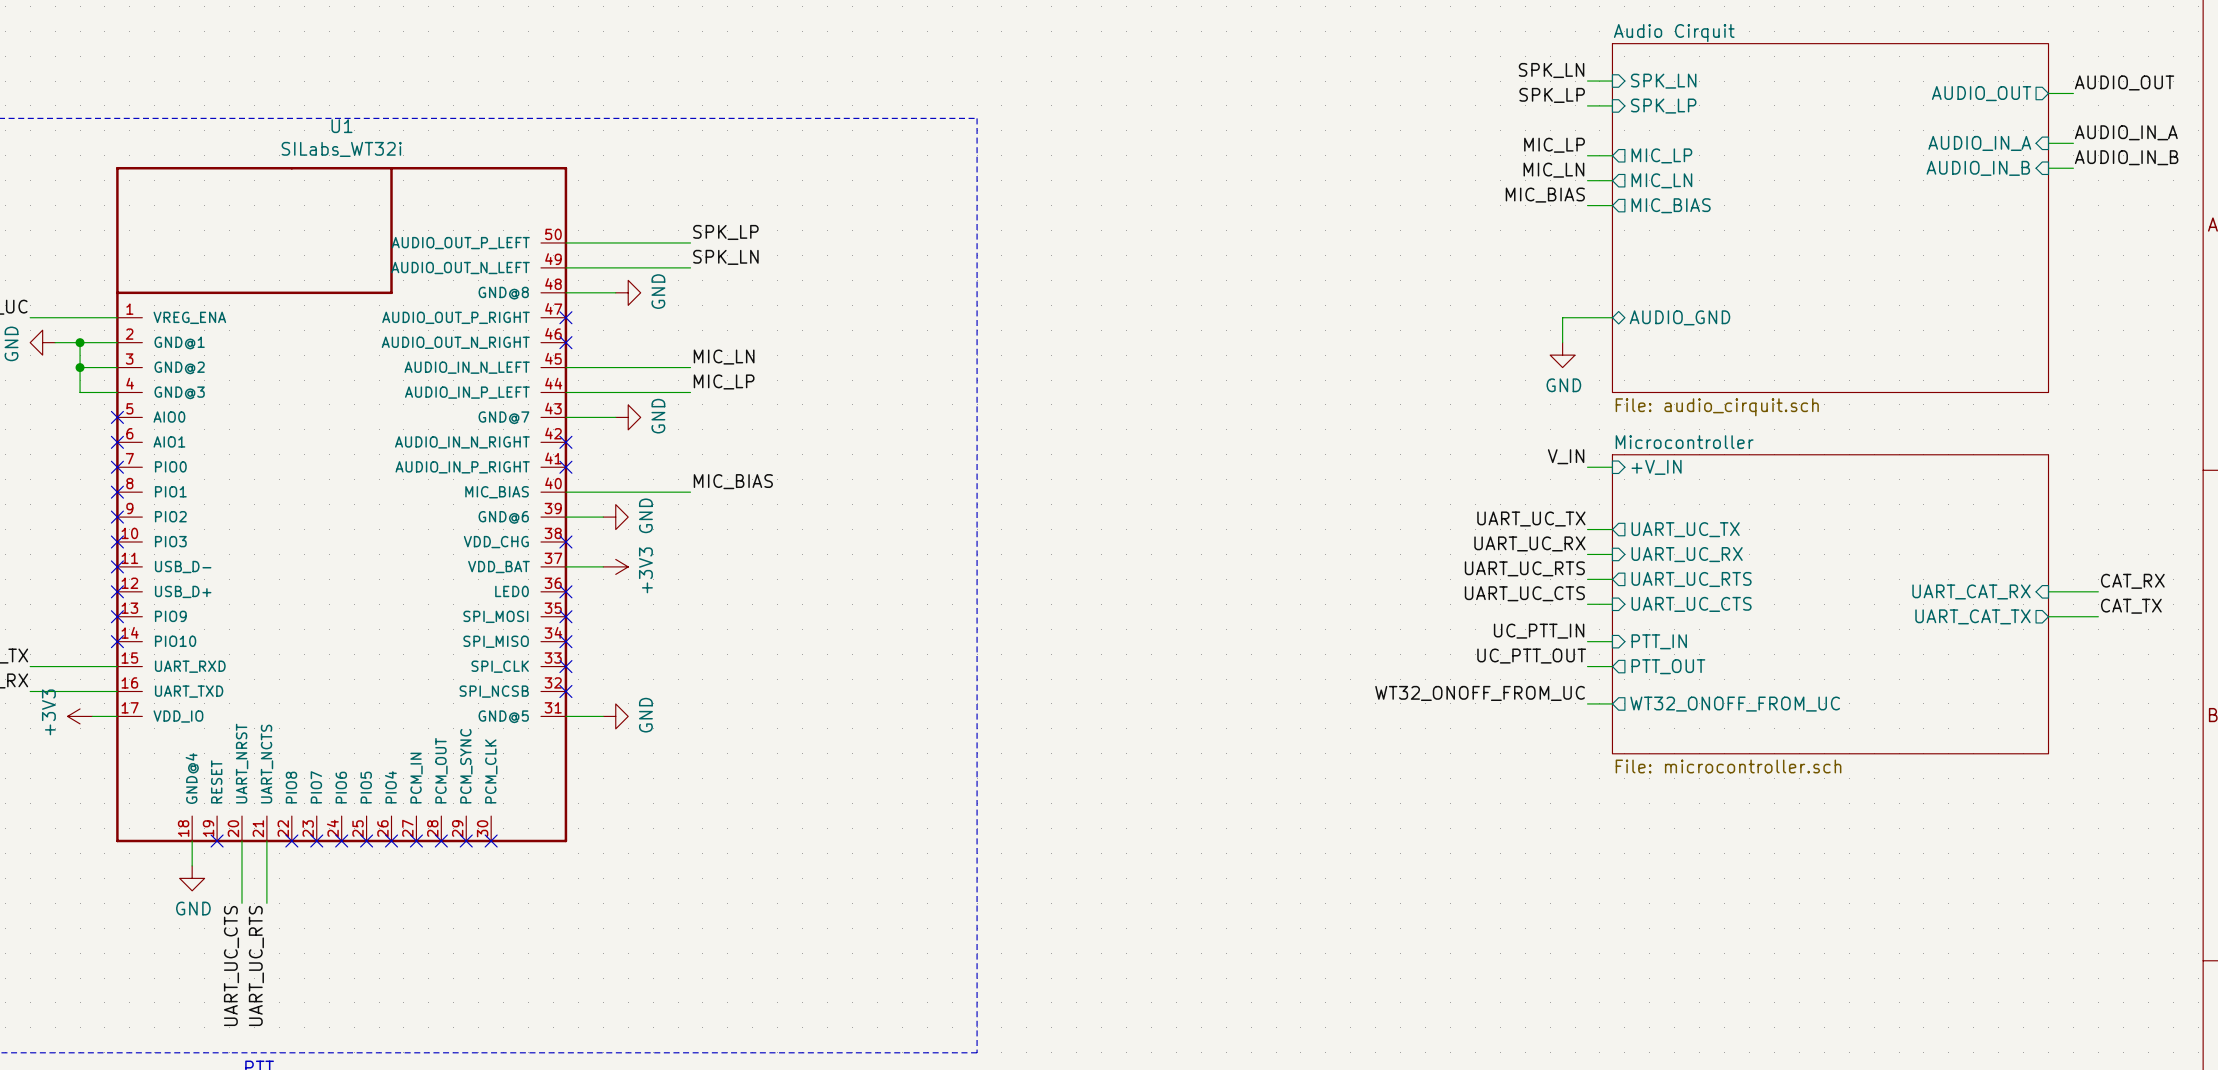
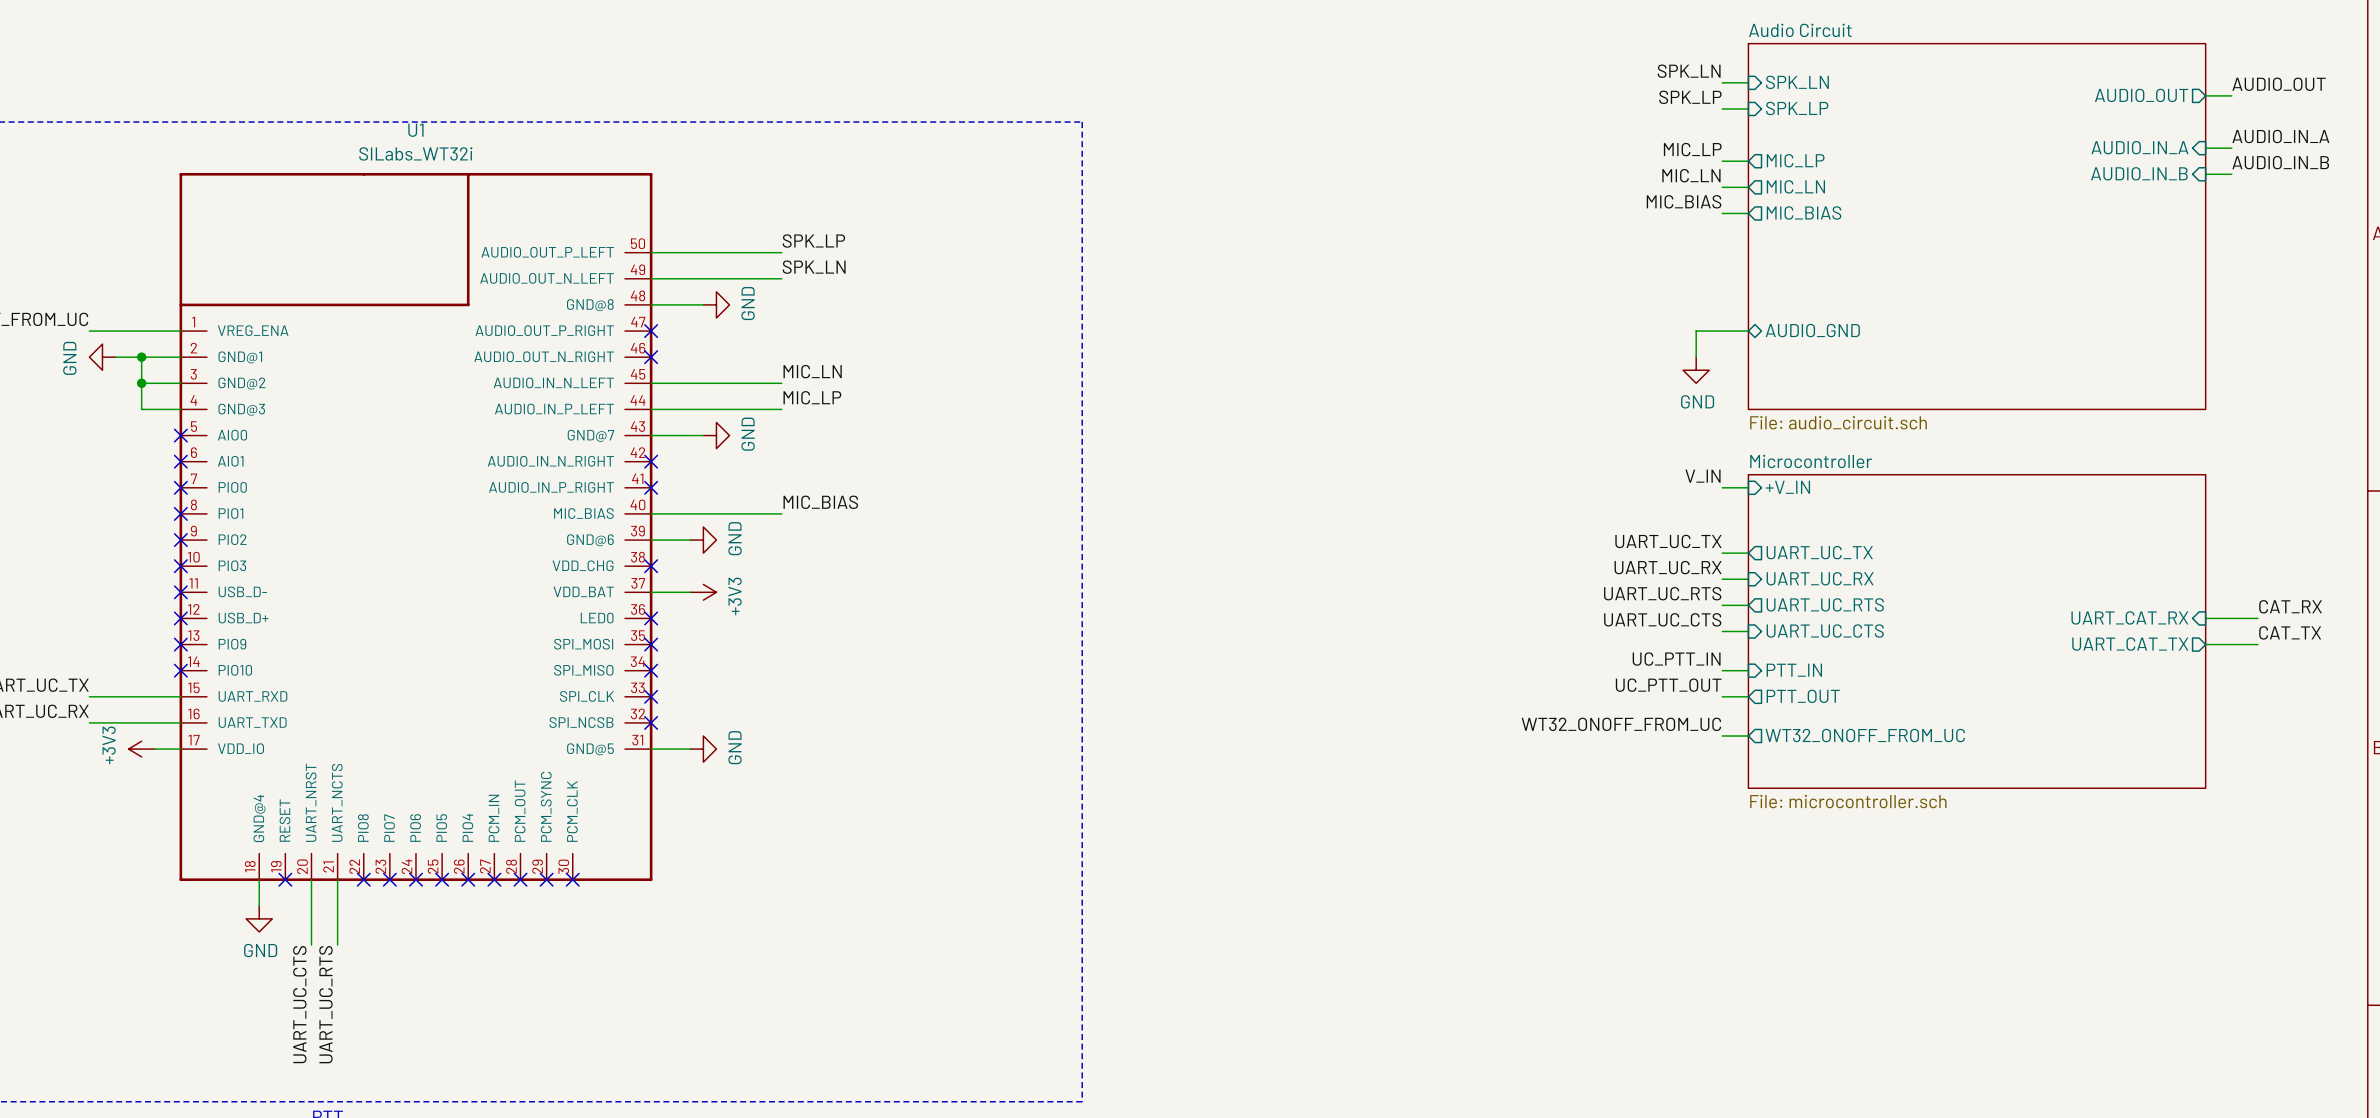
sheet Audio Cirquit name: Audio Cirquit (1674, 33) -> Audio Circuit (1800, 30)
sheet Audio Cirquit value: File: audio_cirquit.sch (1717, 407) -> File: audio_circuit.sch (1838, 422)

